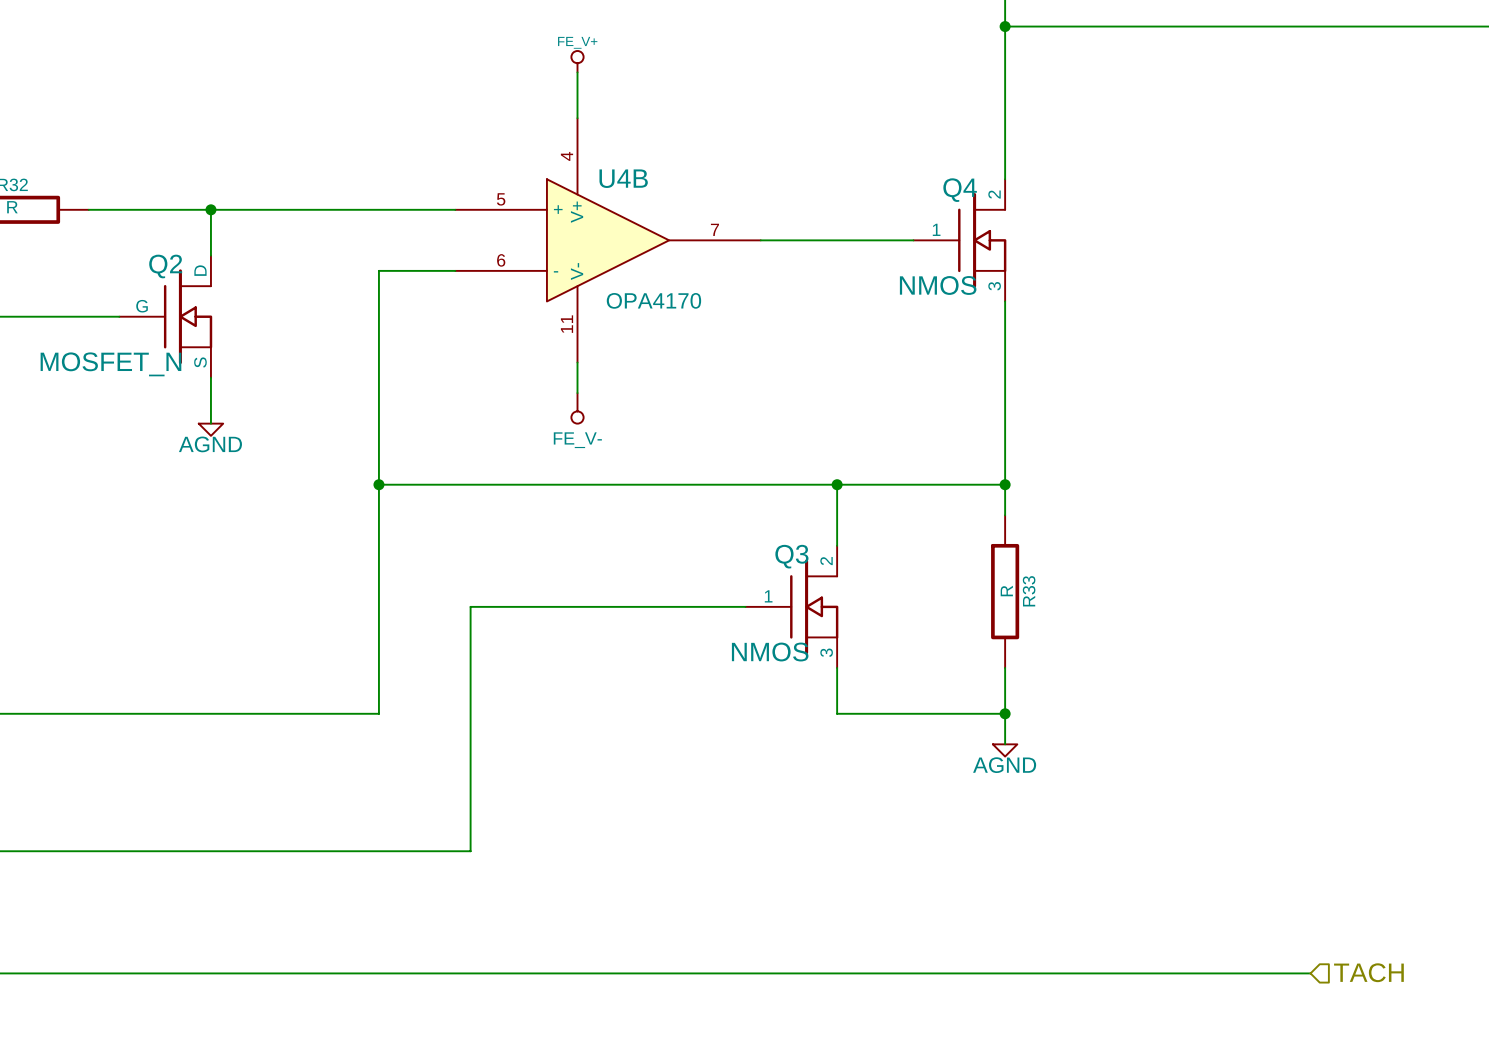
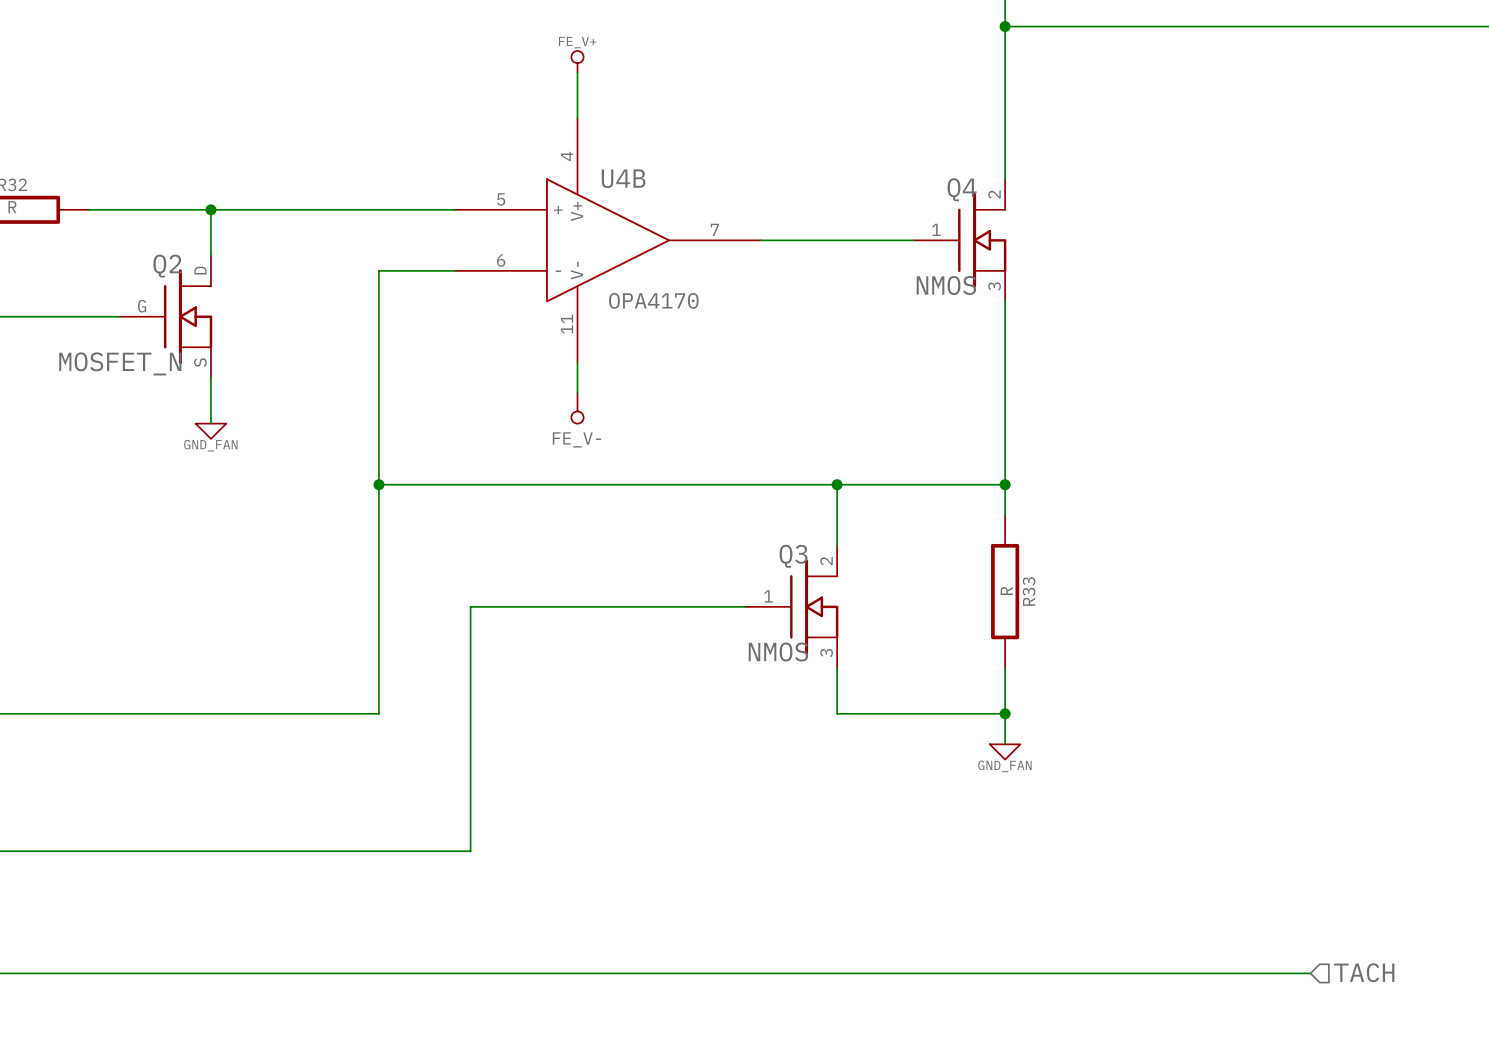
power symbol: AGND (210, 429) -> GND_FAN (210, 431)
power symbol: AGND (1005, 750) -> GND_FAN (1005, 751)

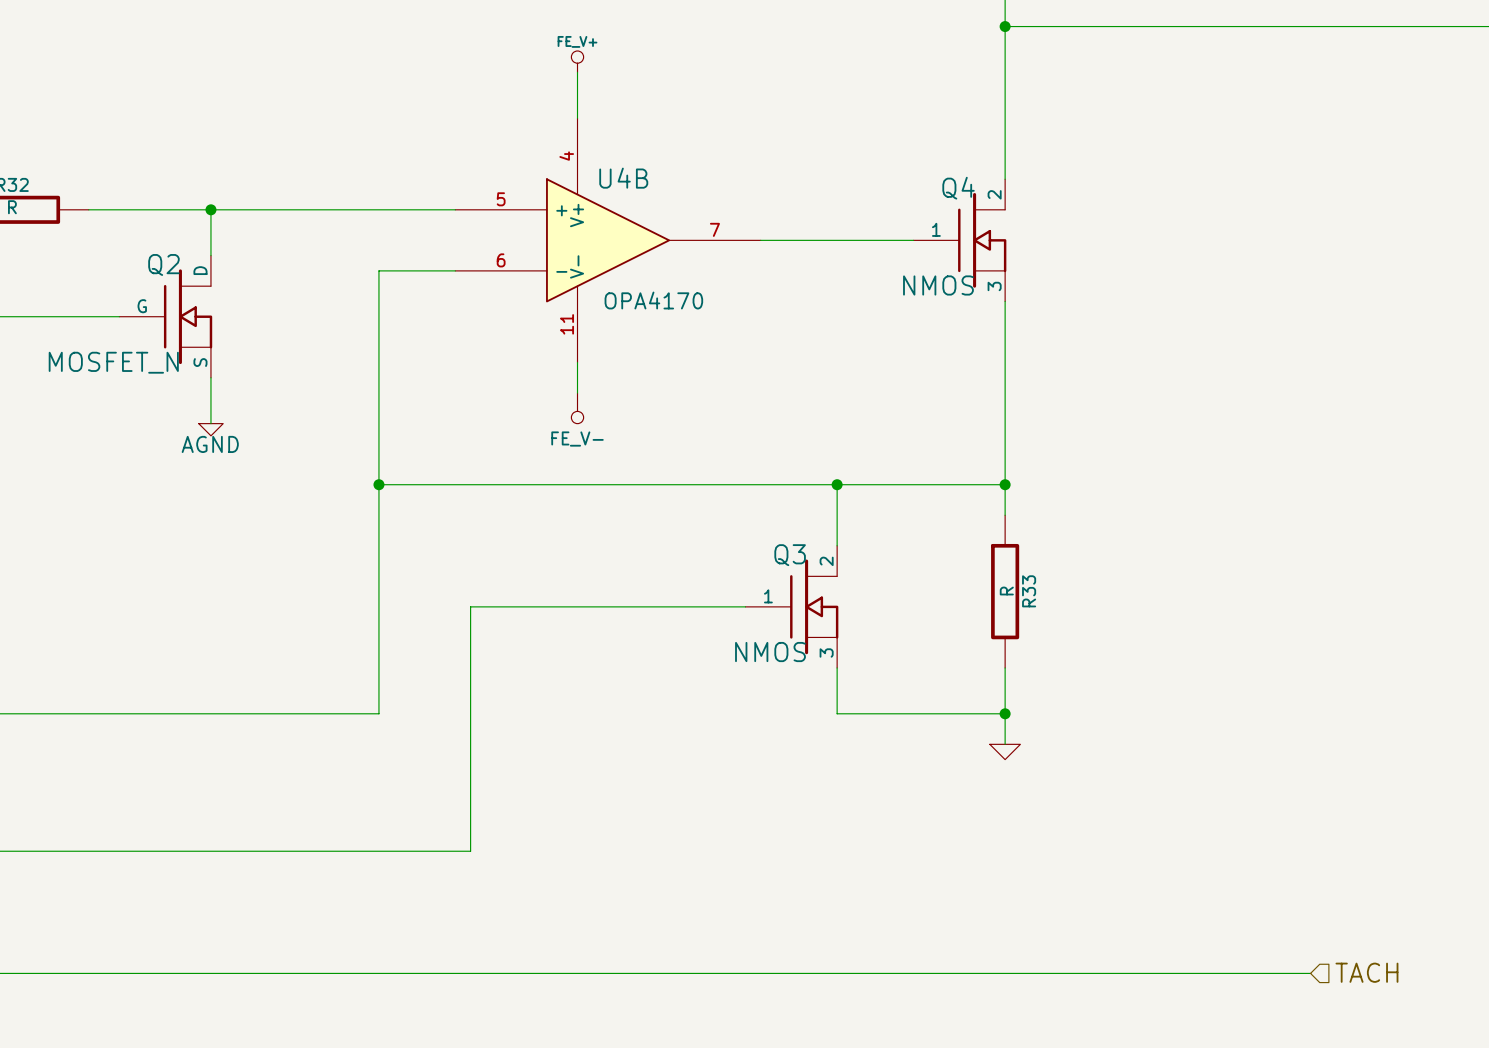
power symbol: GND_FAN (210, 431) -> AGND (210, 429)
power symbol text: GND_FAN (1004, 766) -> none

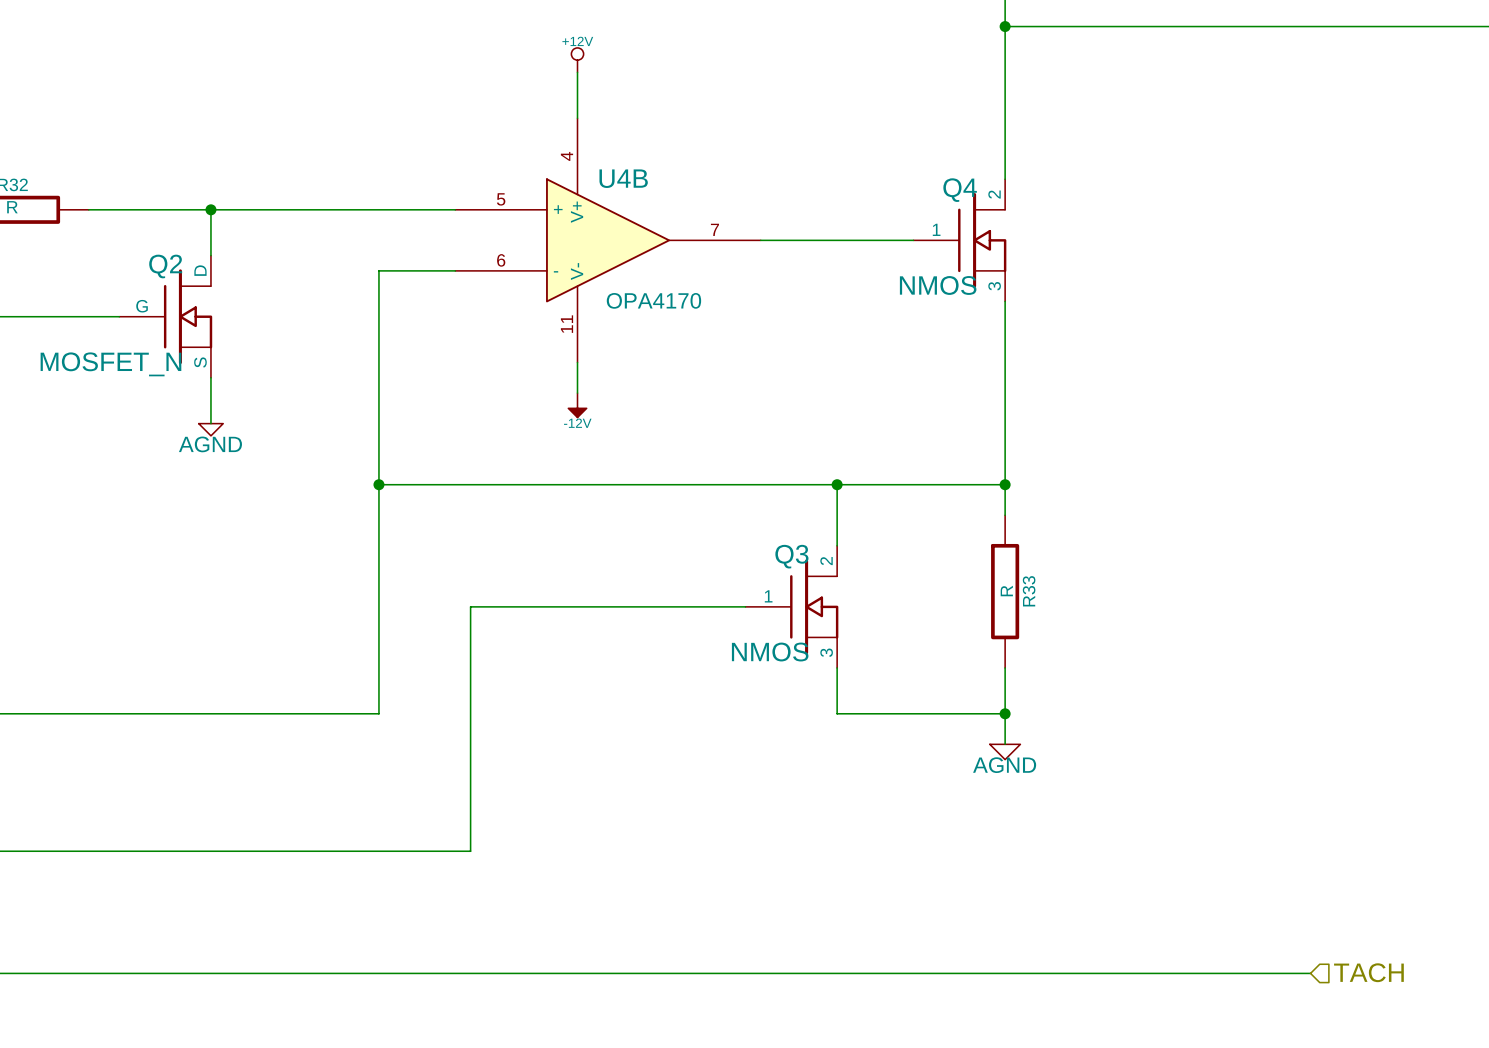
power symbol: FE_V+ (577, 61) -> +12V (577, 60)
power symbol: FE_V- (577, 408) -> -12V (577, 405)
power symbol text: none -> AGND (1004, 765)

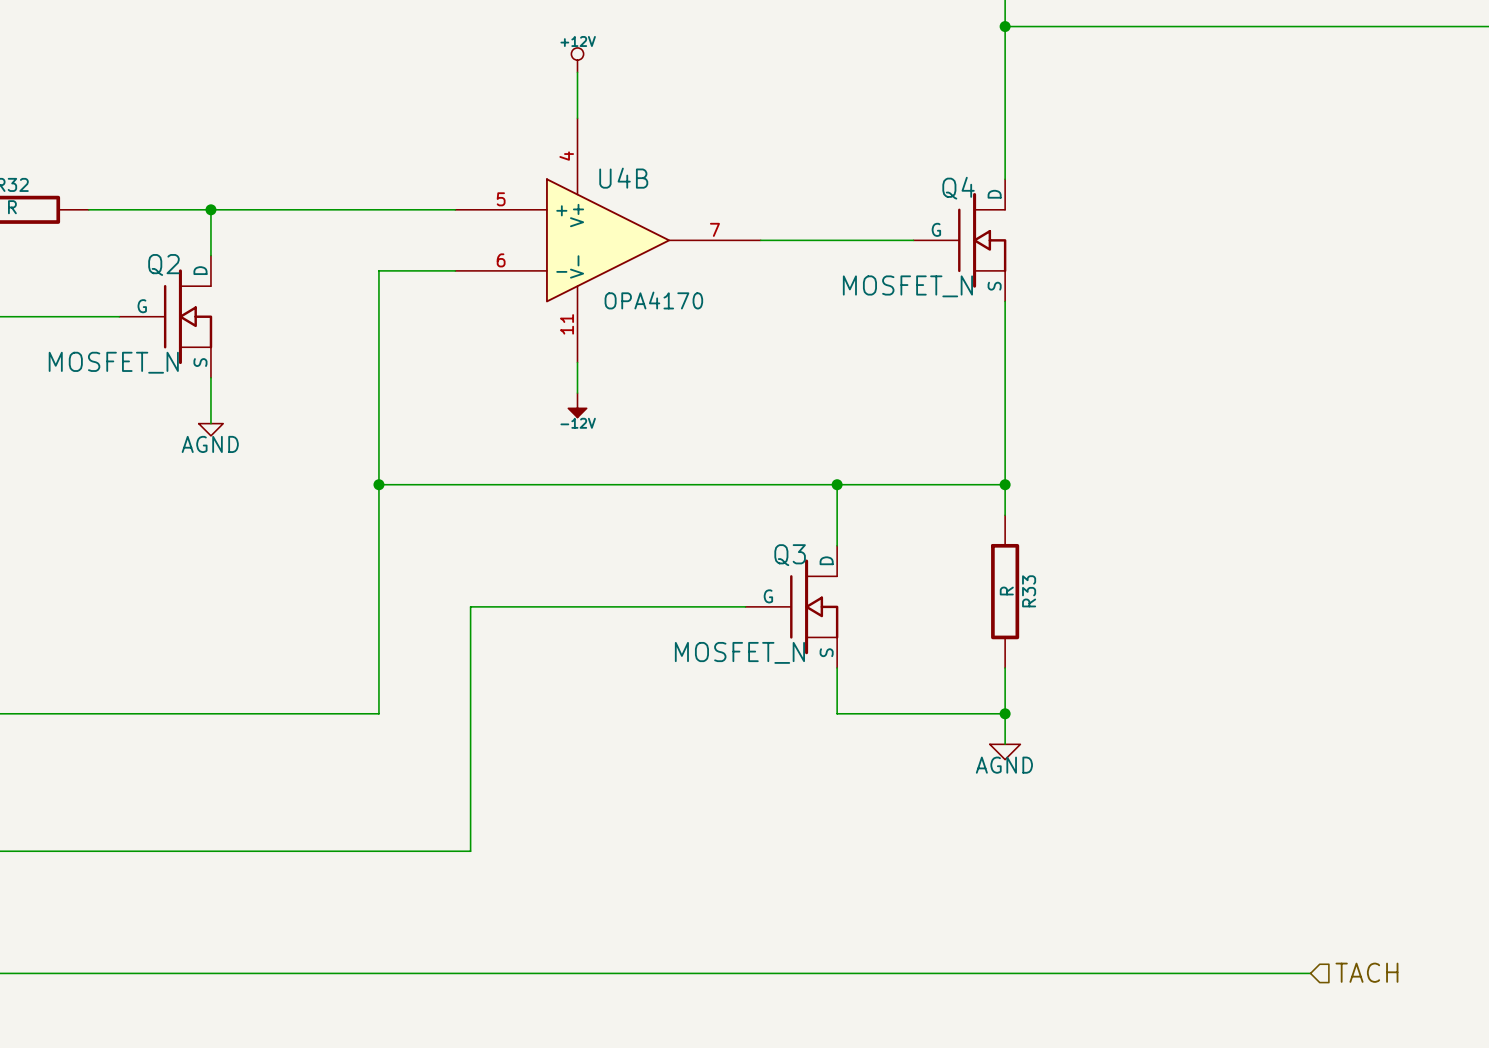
Q4 pin name: 2 (994, 194) -> D (994, 194)
Q4 pin name: 1 (936, 229) -> G (936, 229)
Q4 value: NMOS (938, 285) -> MOSFET_N (907, 286)
Q4 pin name: 3 (994, 286) -> S (994, 286)
Q3 pin name: 2 (826, 561) -> D (826, 560)
Q3 pin name: 1 (768, 596) -> G (768, 596)
Q3 value: NMOS (770, 652) -> MOSFET_N (739, 652)
Q3 pin name: 3 (826, 652) -> S (826, 652)

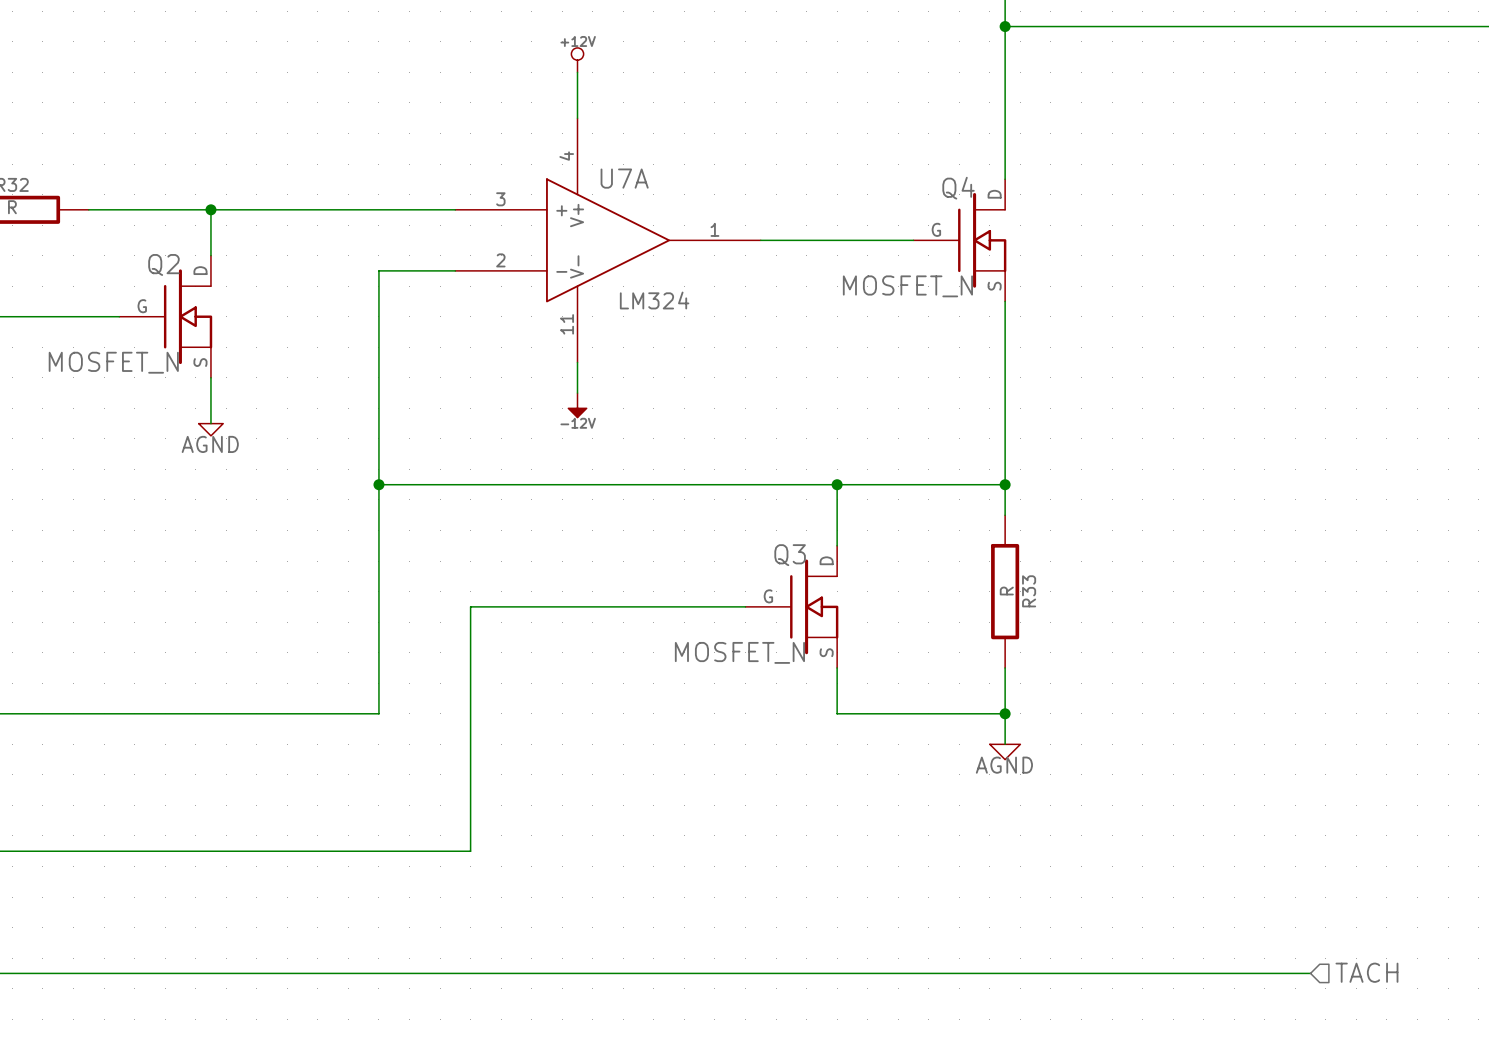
U4B name: U4B (623, 178) -> U7A (624, 178)
U4B pin number: 5 (501, 199) -> 3 (500, 199)
U4B pin number: 7 (714, 229) -> 1 (714, 229)
U4B pin number: 6 (501, 260) -> 2 (500, 260)
U4B value: OPA4170 (653, 300) -> LM324 (654, 300)

